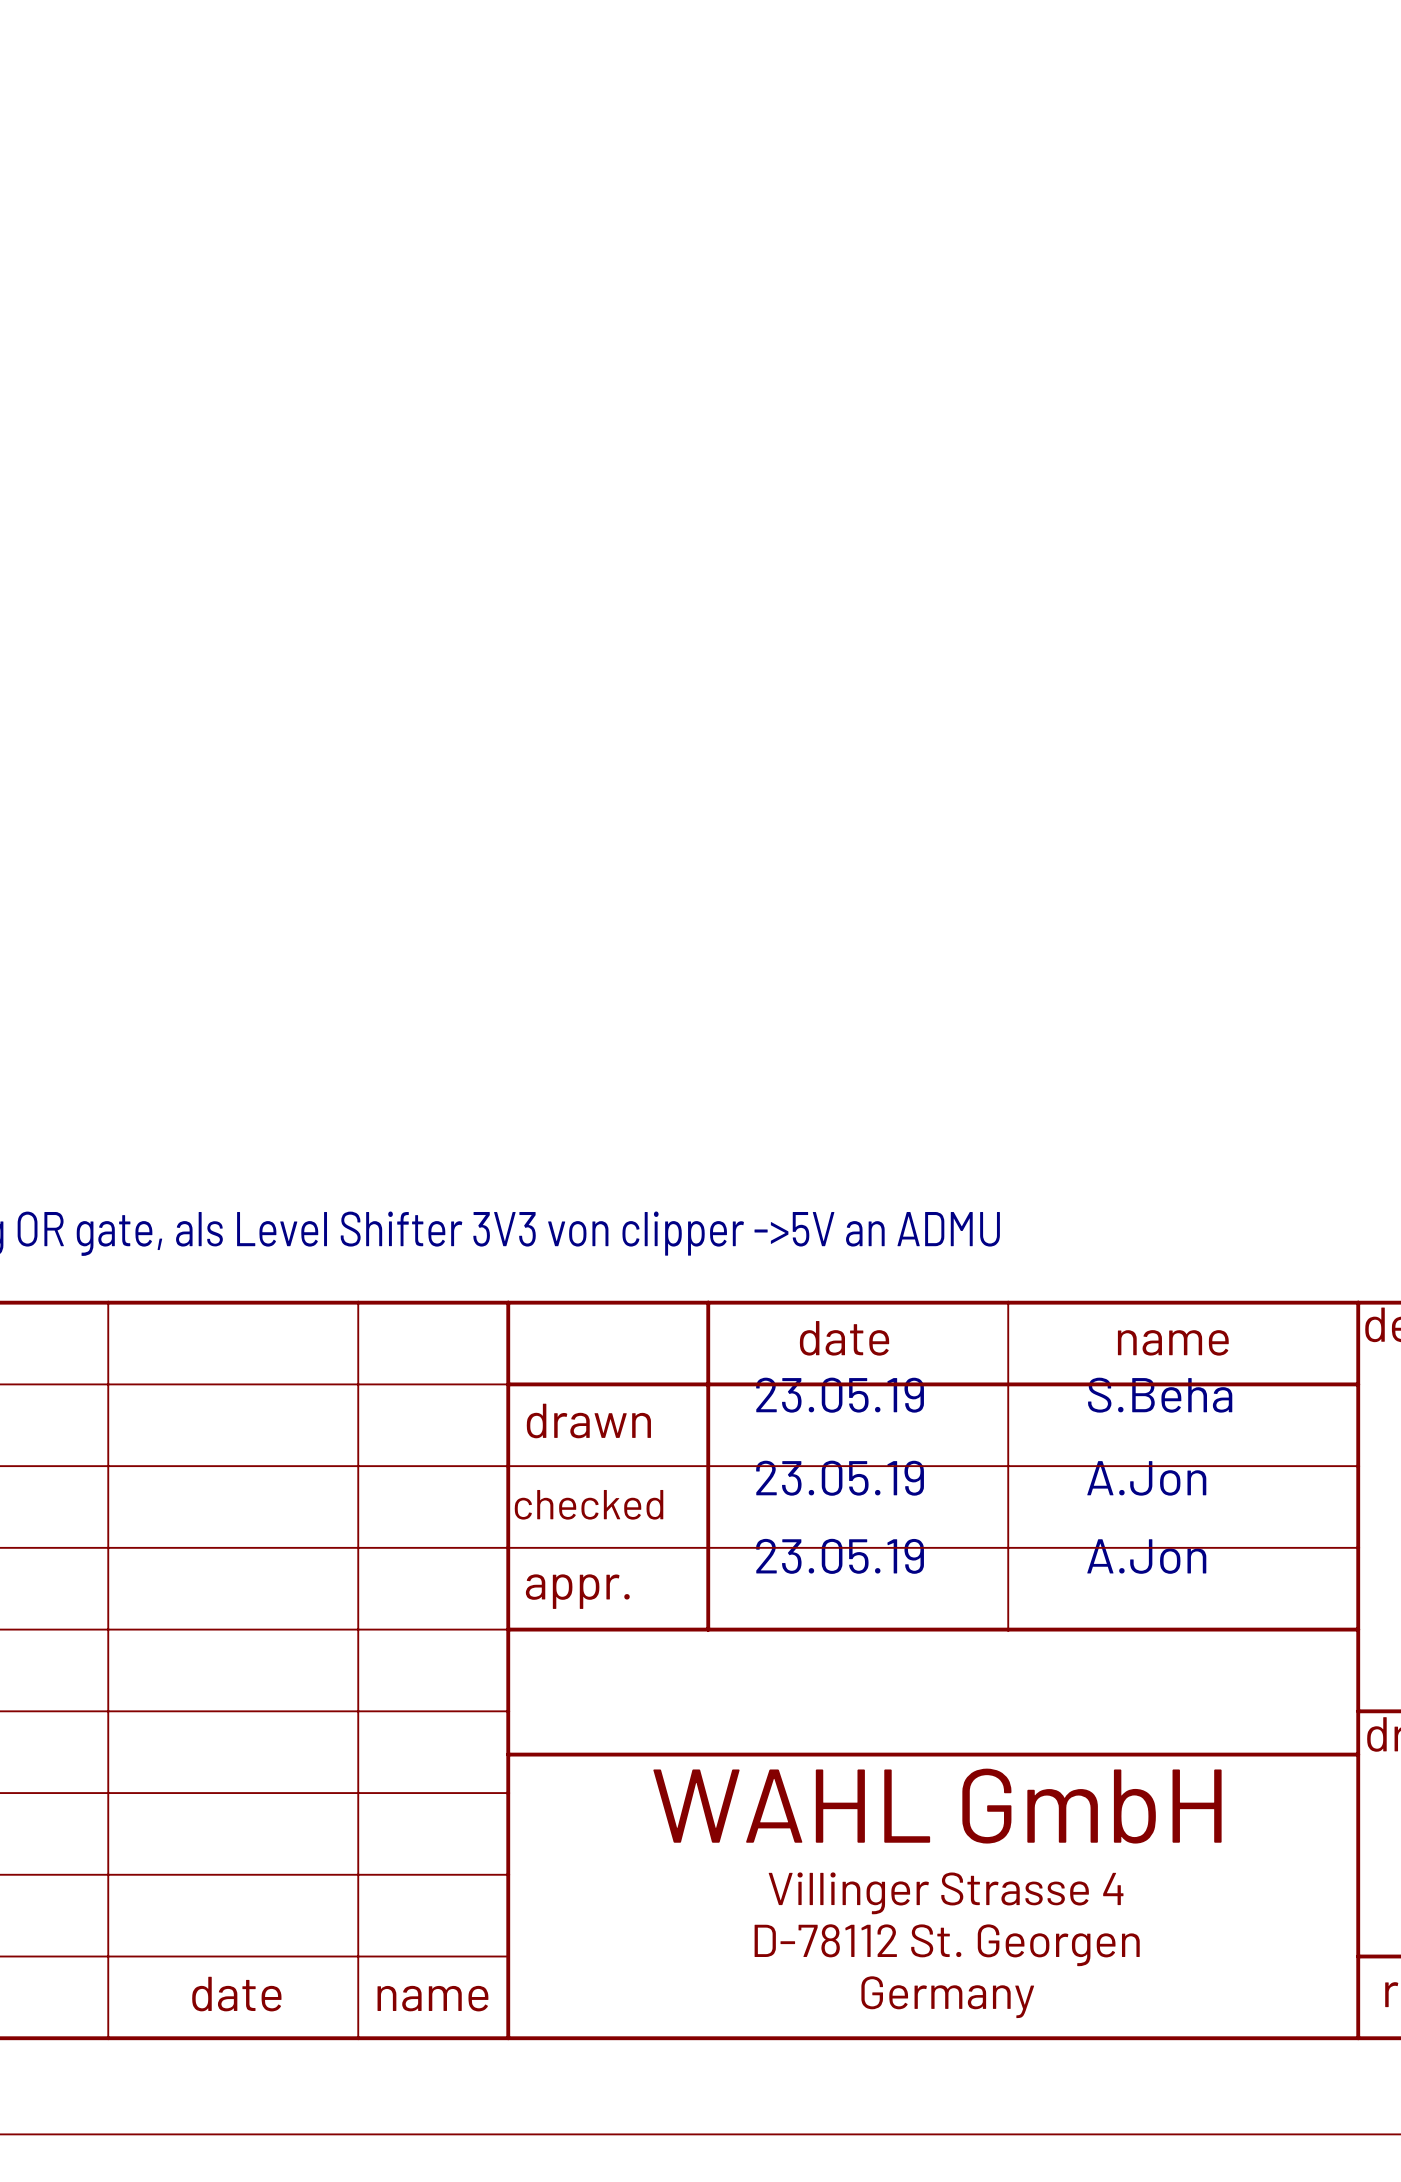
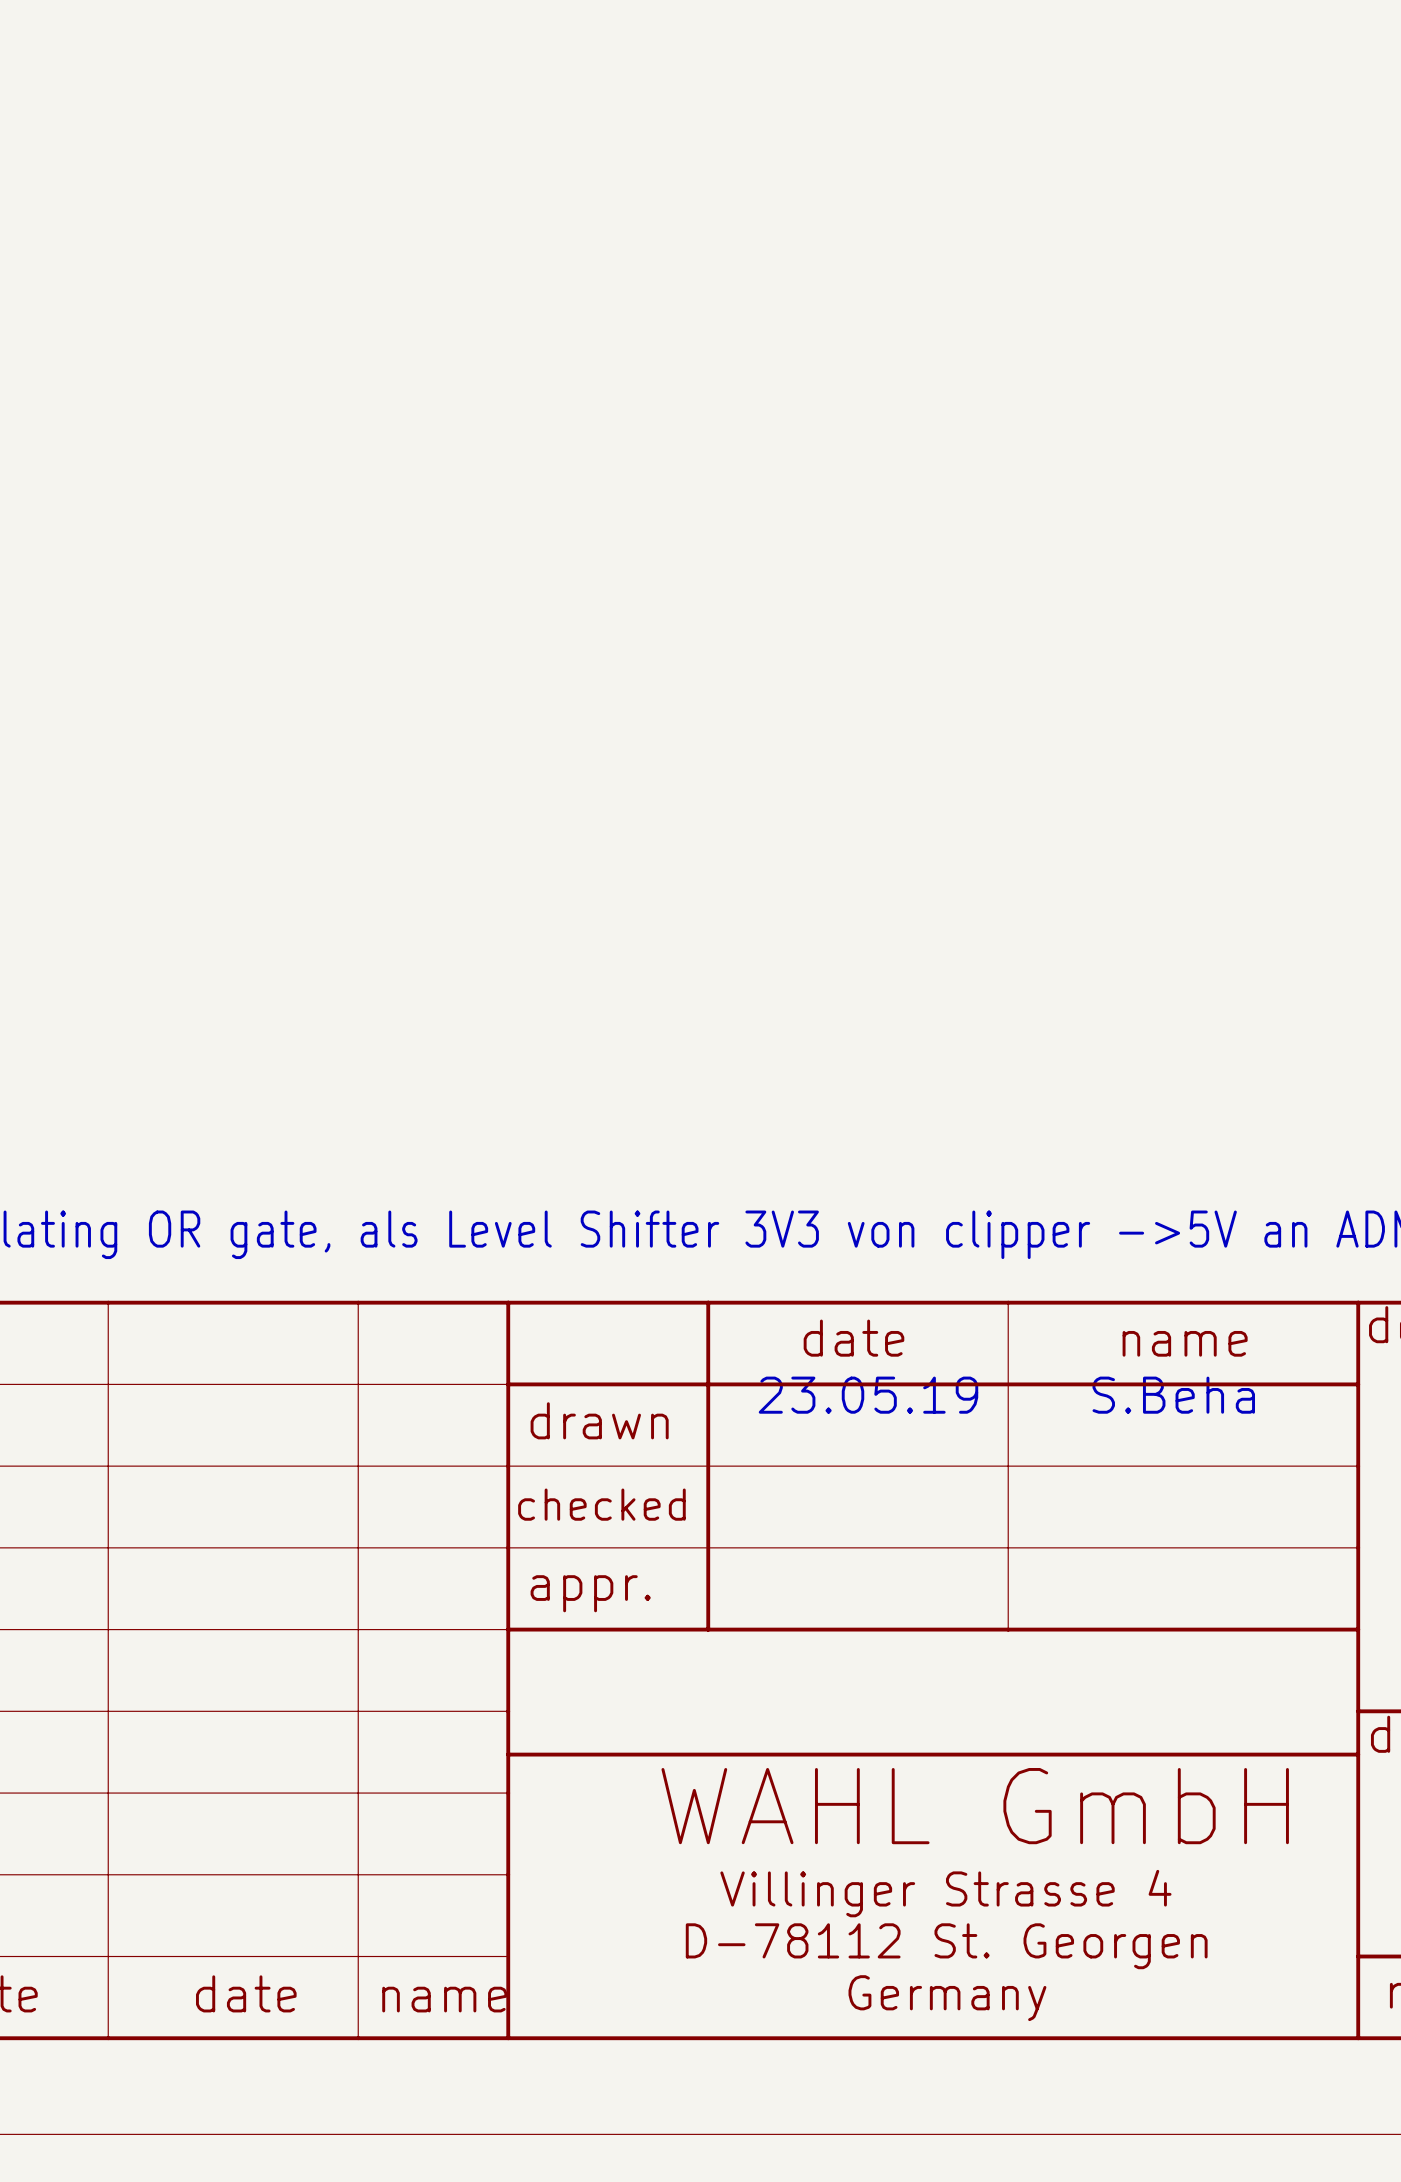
text: 23.05.19 (840, 1478) -> none
text: A.Jon (1146, 1478) -> none
text: 23.05.19 (840, 1556) -> none
text: A.Jon (1146, 1556) -> none

